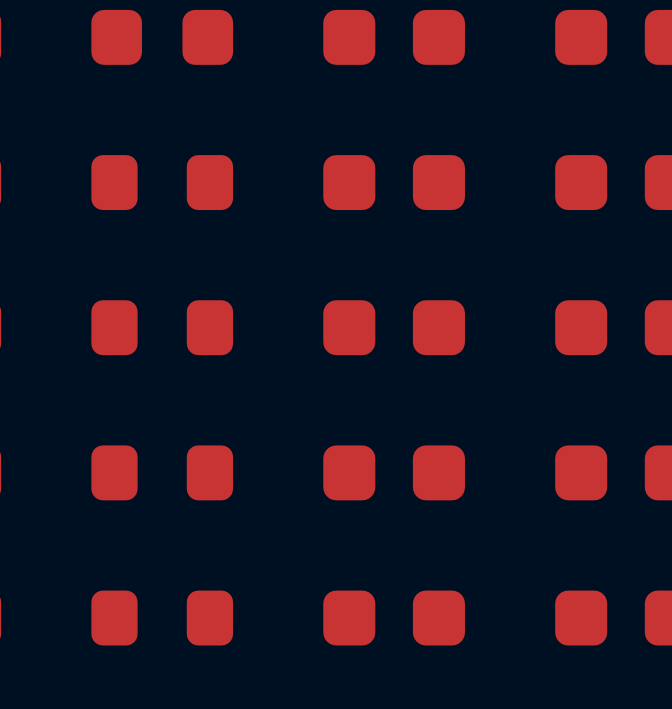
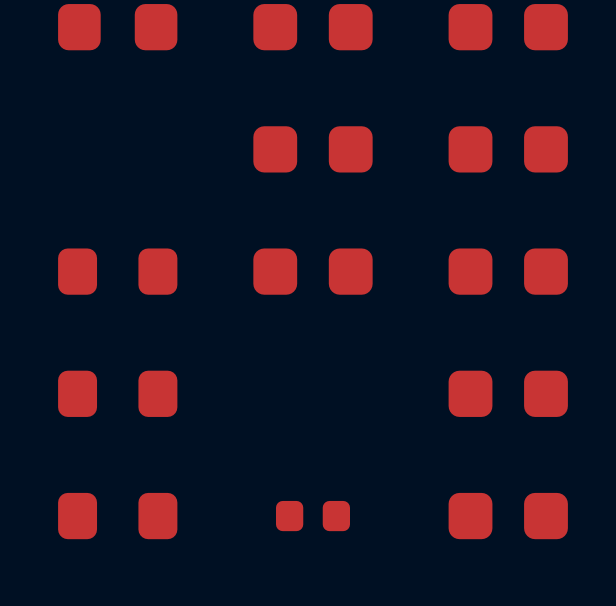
part: (162, 182) -> none
part: (394, 472) -> none
part footprint: [323, 590, 465, 646] -> [275, 500, 351, 532]

